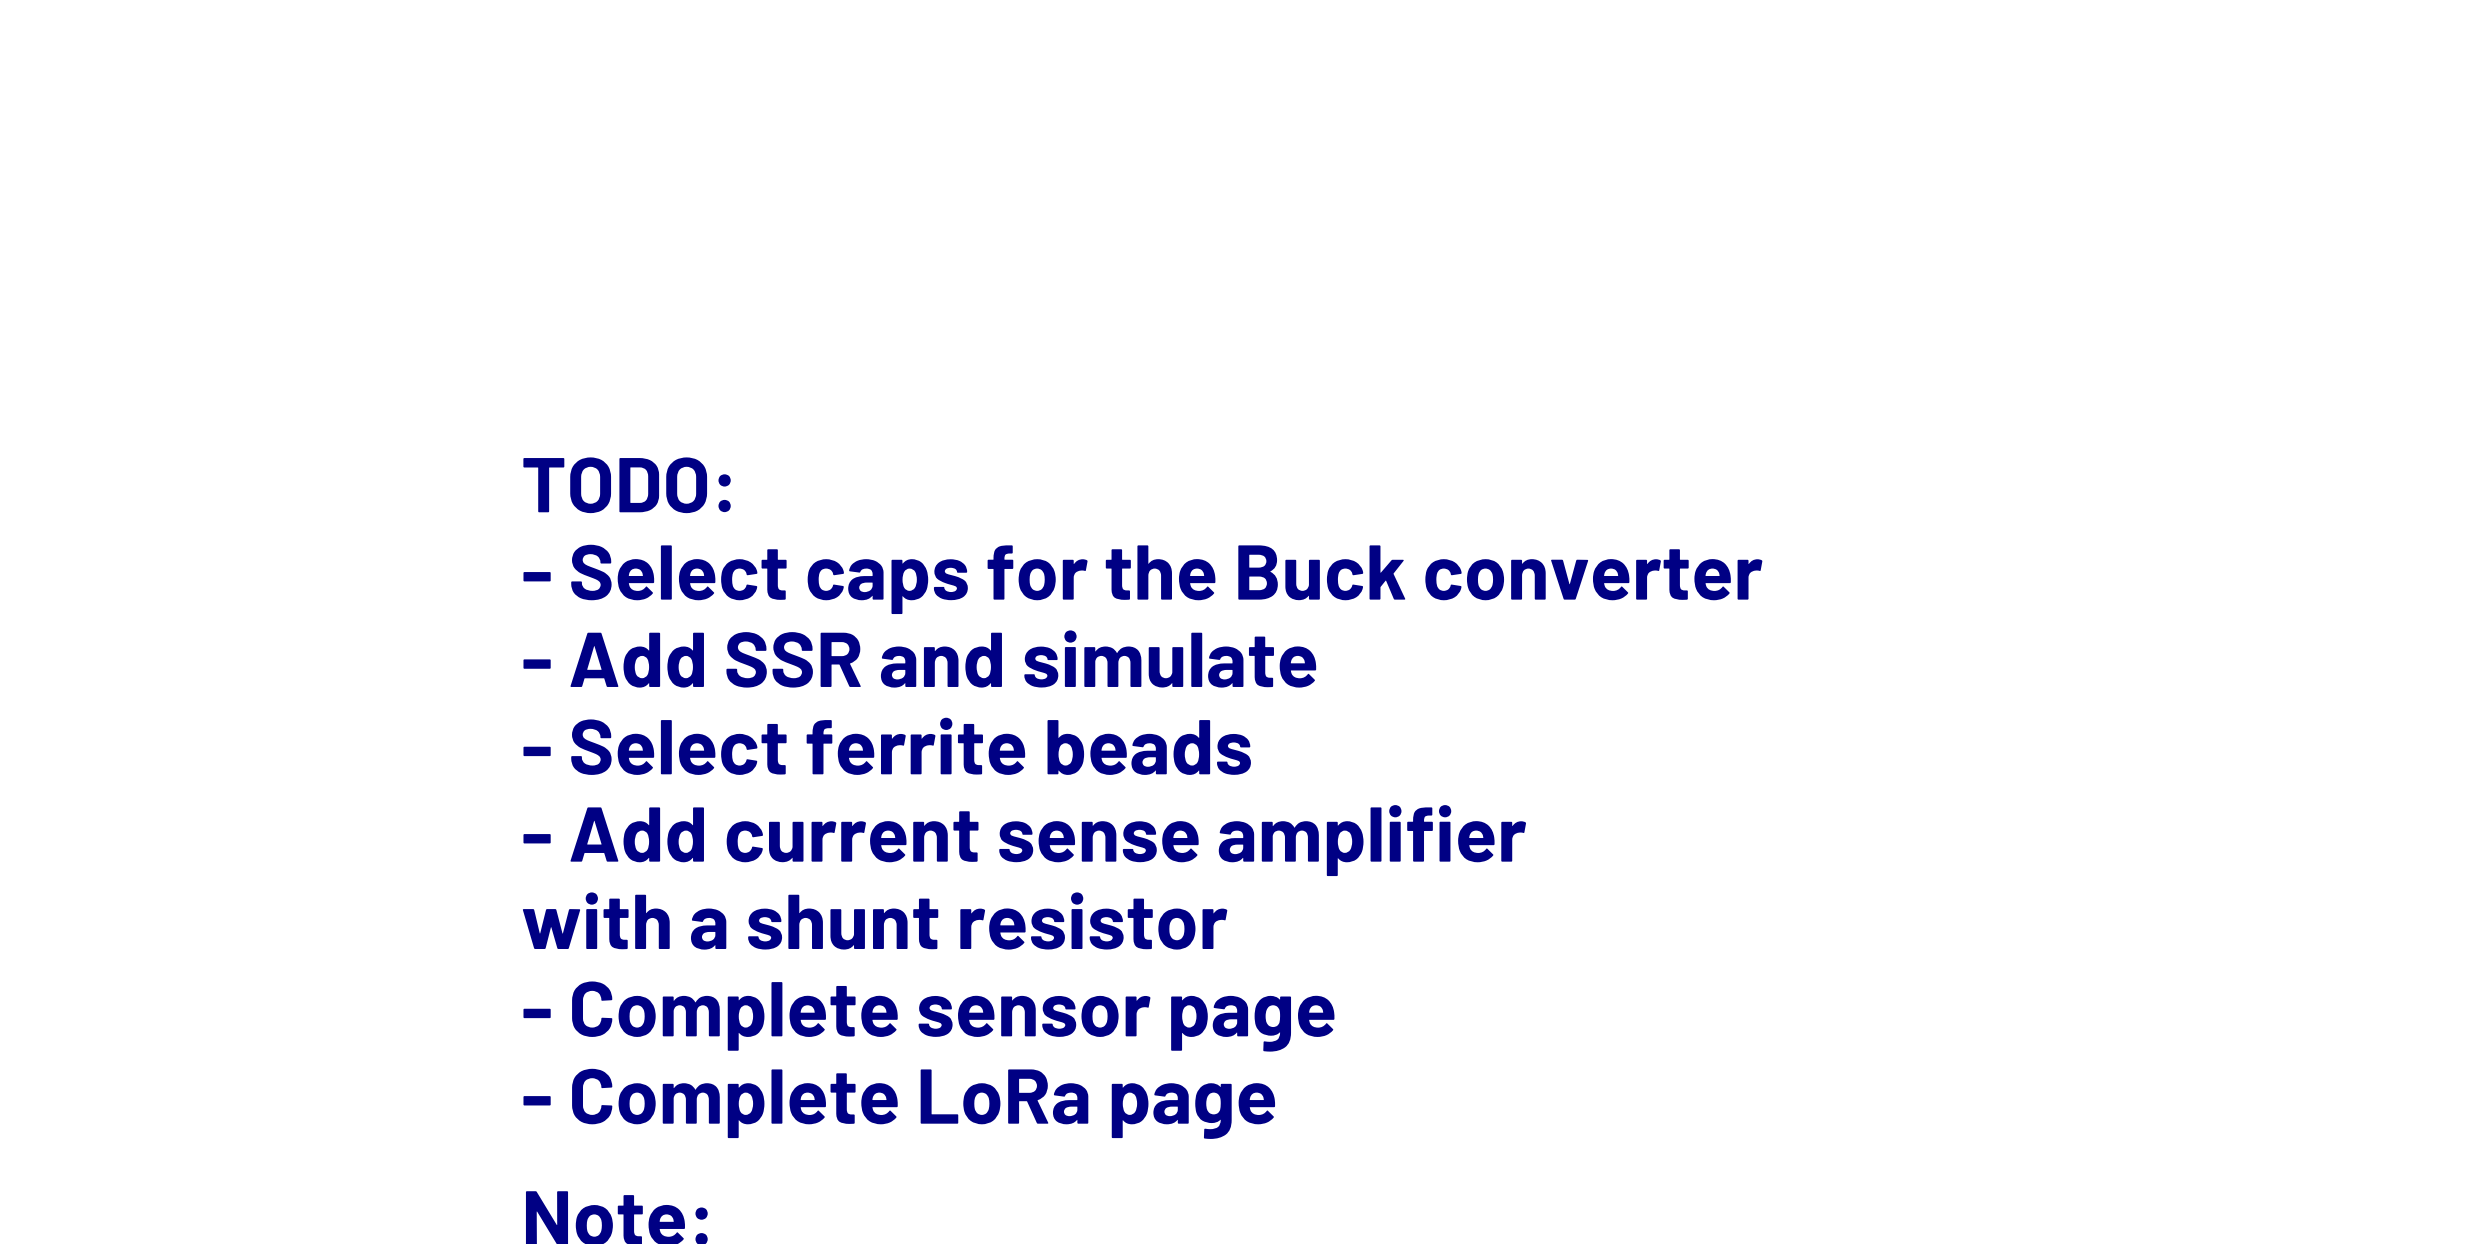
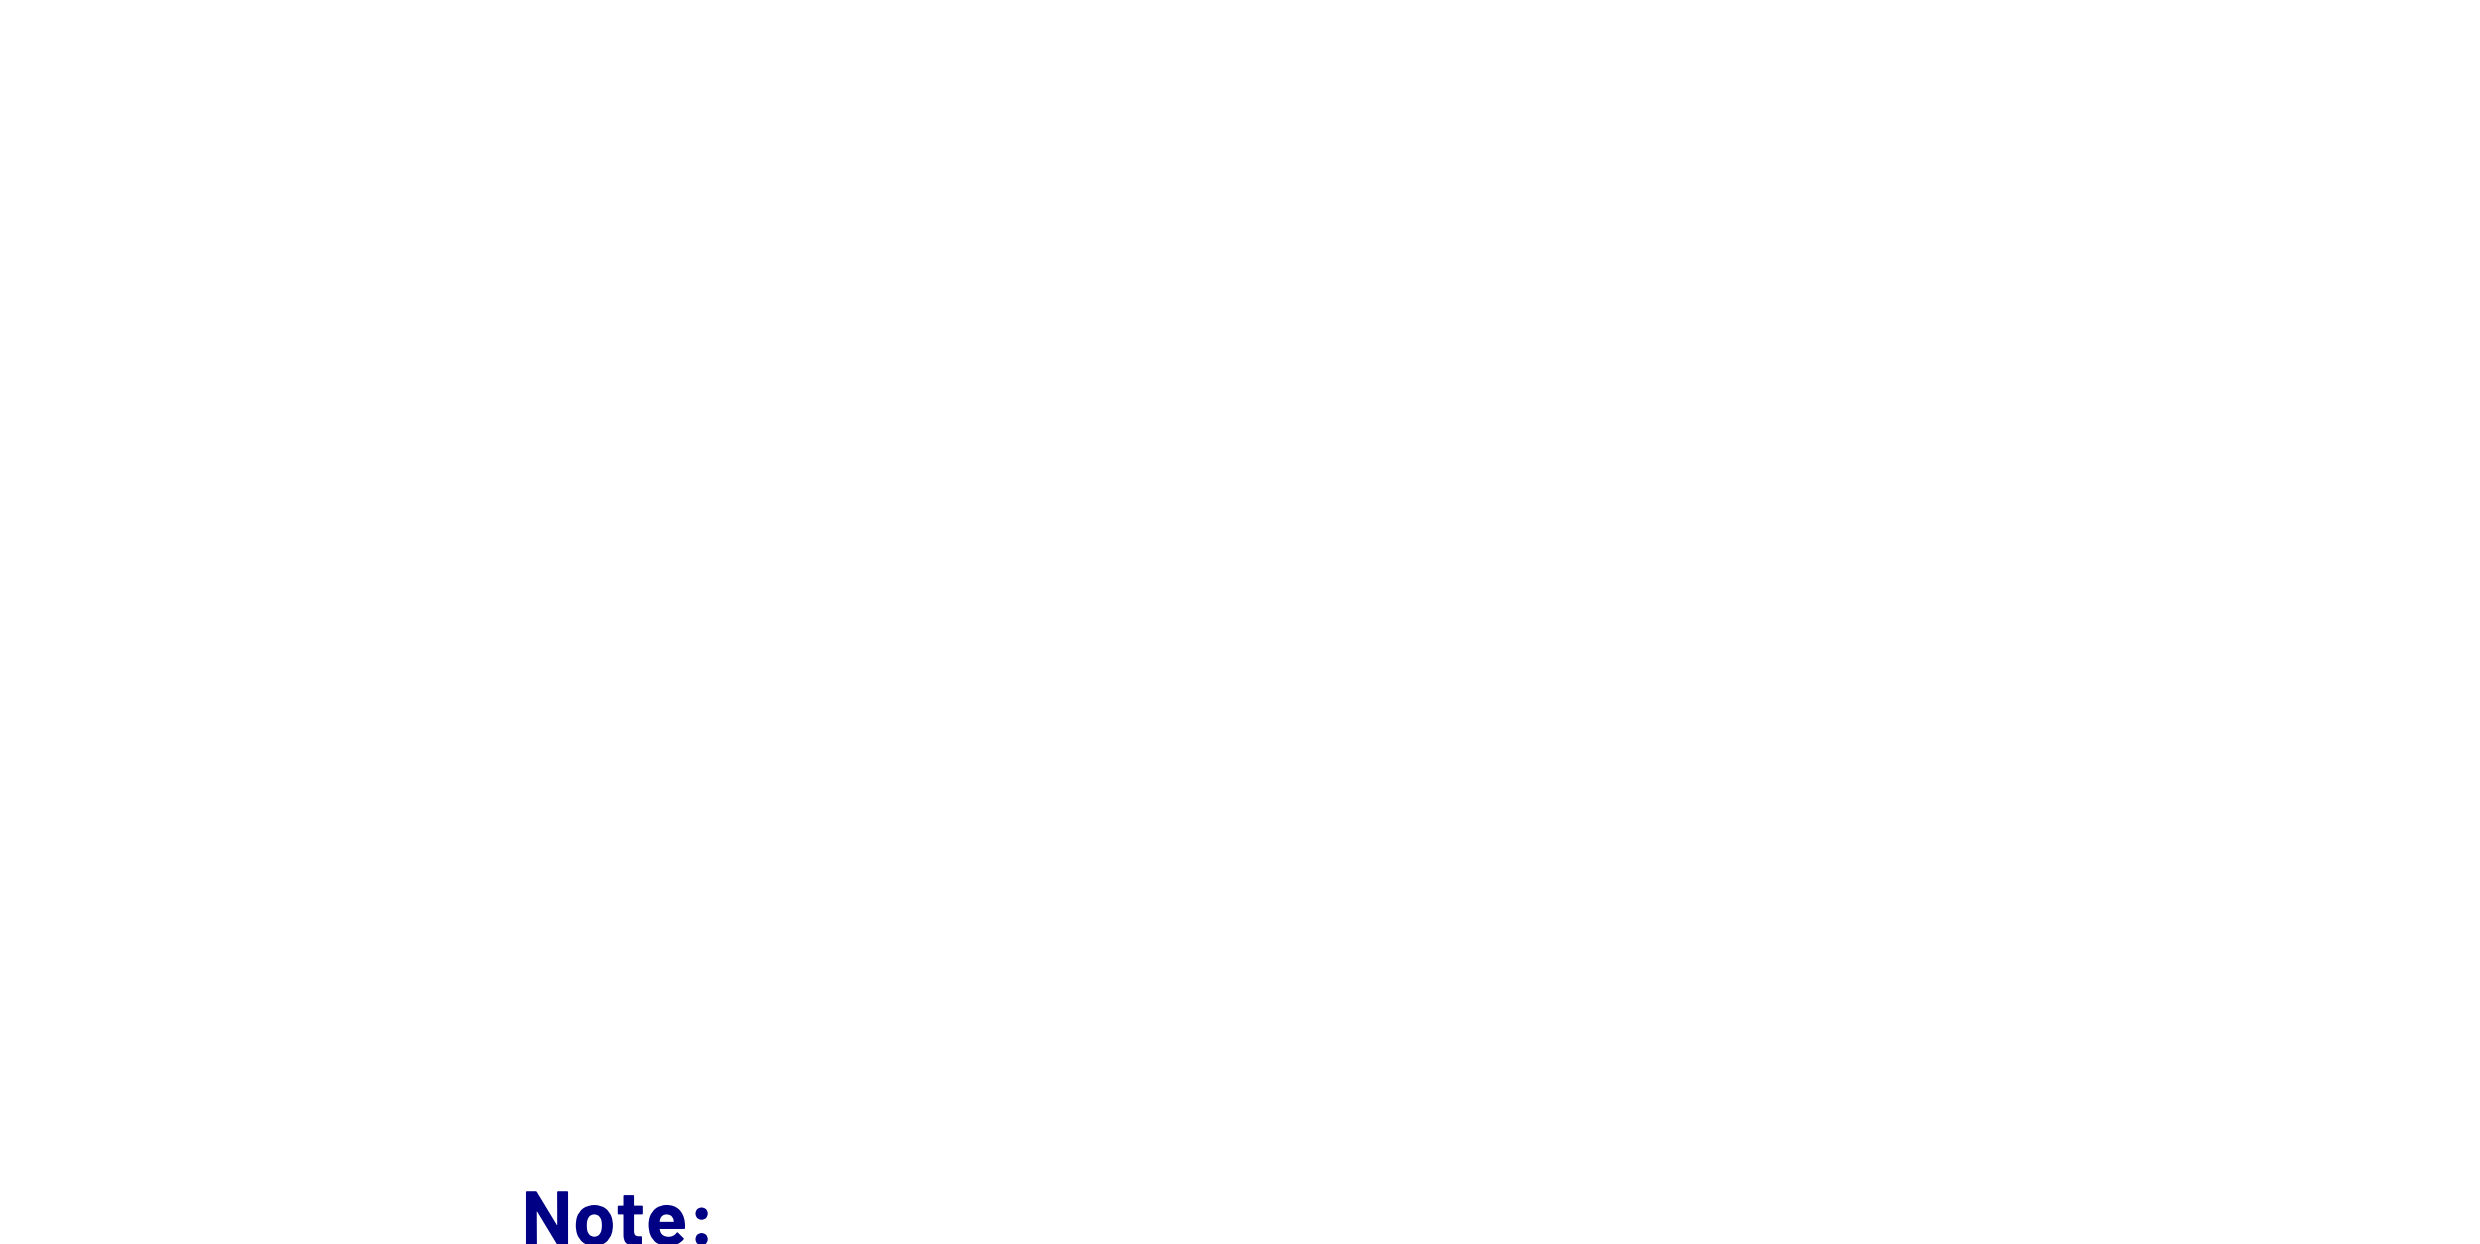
text: TODO: (627, 485) -> none
text: - Select caps for the Buck converter (1142, 579) -> none
text: - Add SSR and simulate (919, 658) -> none
text: - Select ferrite beads (887, 746) -> none
text: - Add current sense amplifier (1024, 840) -> none
text: with a shunt resistor (875, 921) -> none
text: - Complete sensor page (929, 1016) -> none
text: - Complete LoRa page (899, 1103) -> none

